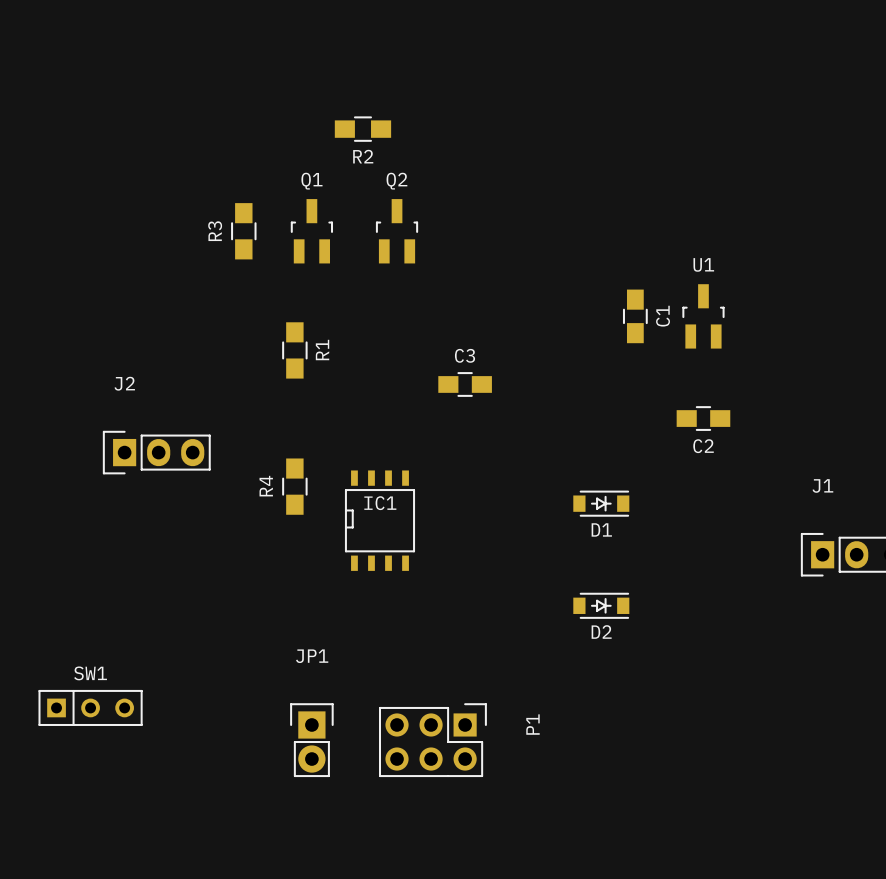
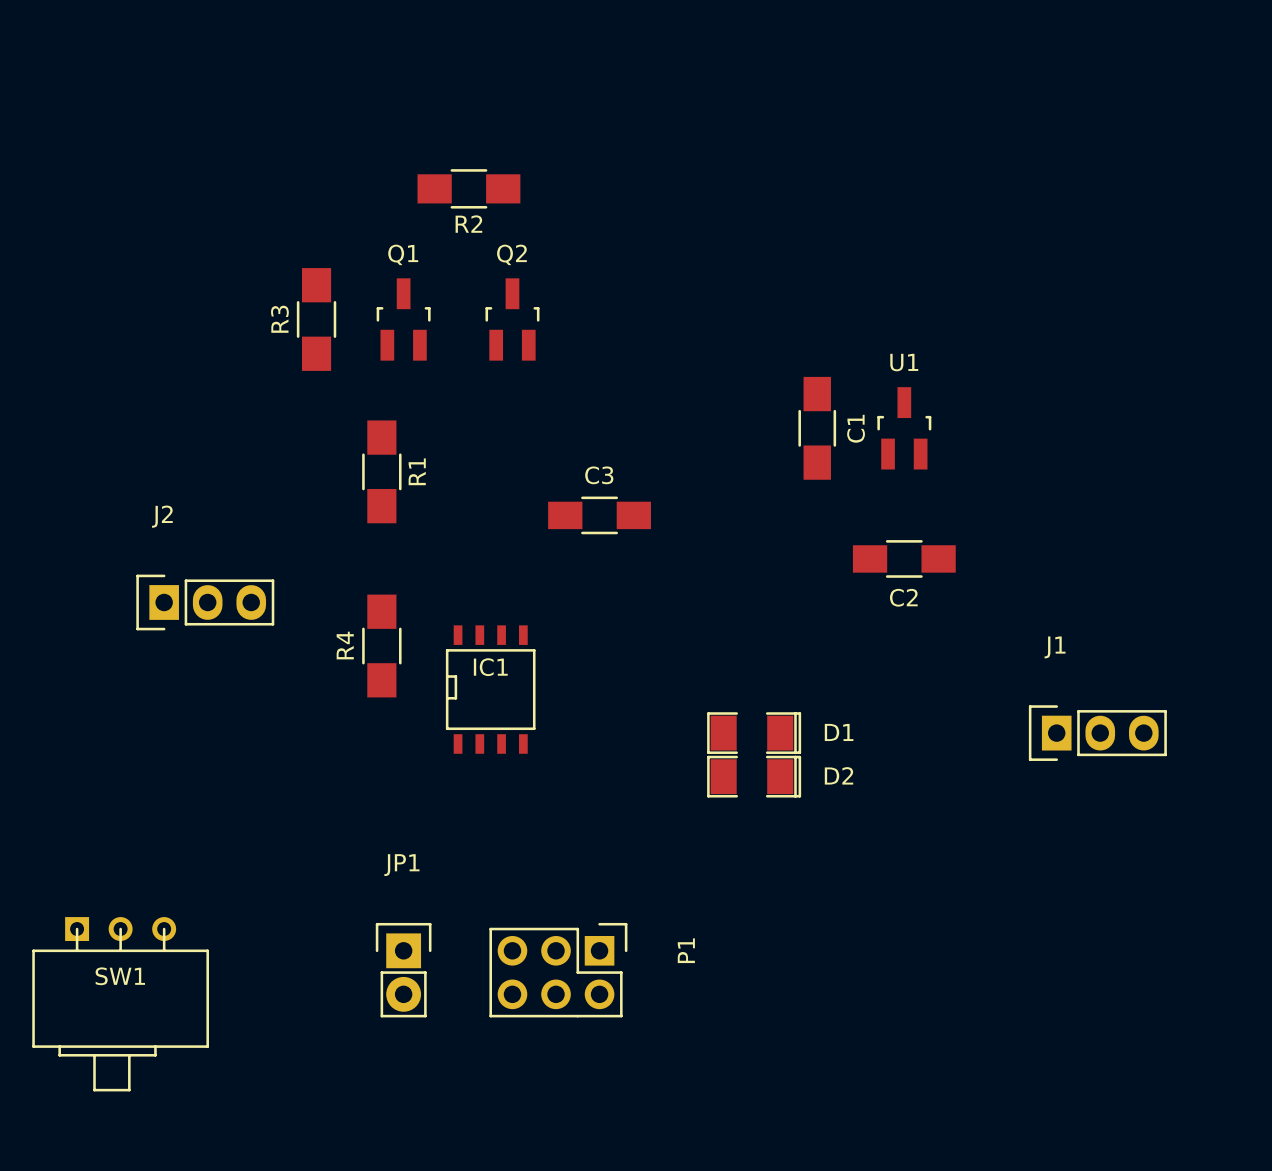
R2 footprint: [334, 116, 392, 142] -> [417, 169, 521, 209]
R3 footprint: [231, 203, 257, 260] -> [296, 268, 337, 371]
C1 footprint: [622, 289, 648, 344] -> [798, 376, 837, 480]
R1 footprint: [282, 322, 308, 379] -> [362, 420, 402, 524]
C3 footprint: [438, 372, 492, 397] -> [548, 496, 651, 535]
C2 footprint: [676, 406, 731, 431] -> [852, 540, 956, 578]
R4 footprint: [282, 458, 308, 515] -> [362, 594, 402, 698]
D1 footprint: [573, 490, 630, 517] -> [707, 712, 802, 754]
D1 name position: D1 (601, 529) -> D1 (839, 732)
D2 footprint: [573, 592, 630, 619] -> [707, 755, 802, 798]
D2 name position: D2 (601, 632) -> D2 (839, 775)
SW1 footprint: [38, 689, 143, 726] -> [32, 917, 209, 1092]

